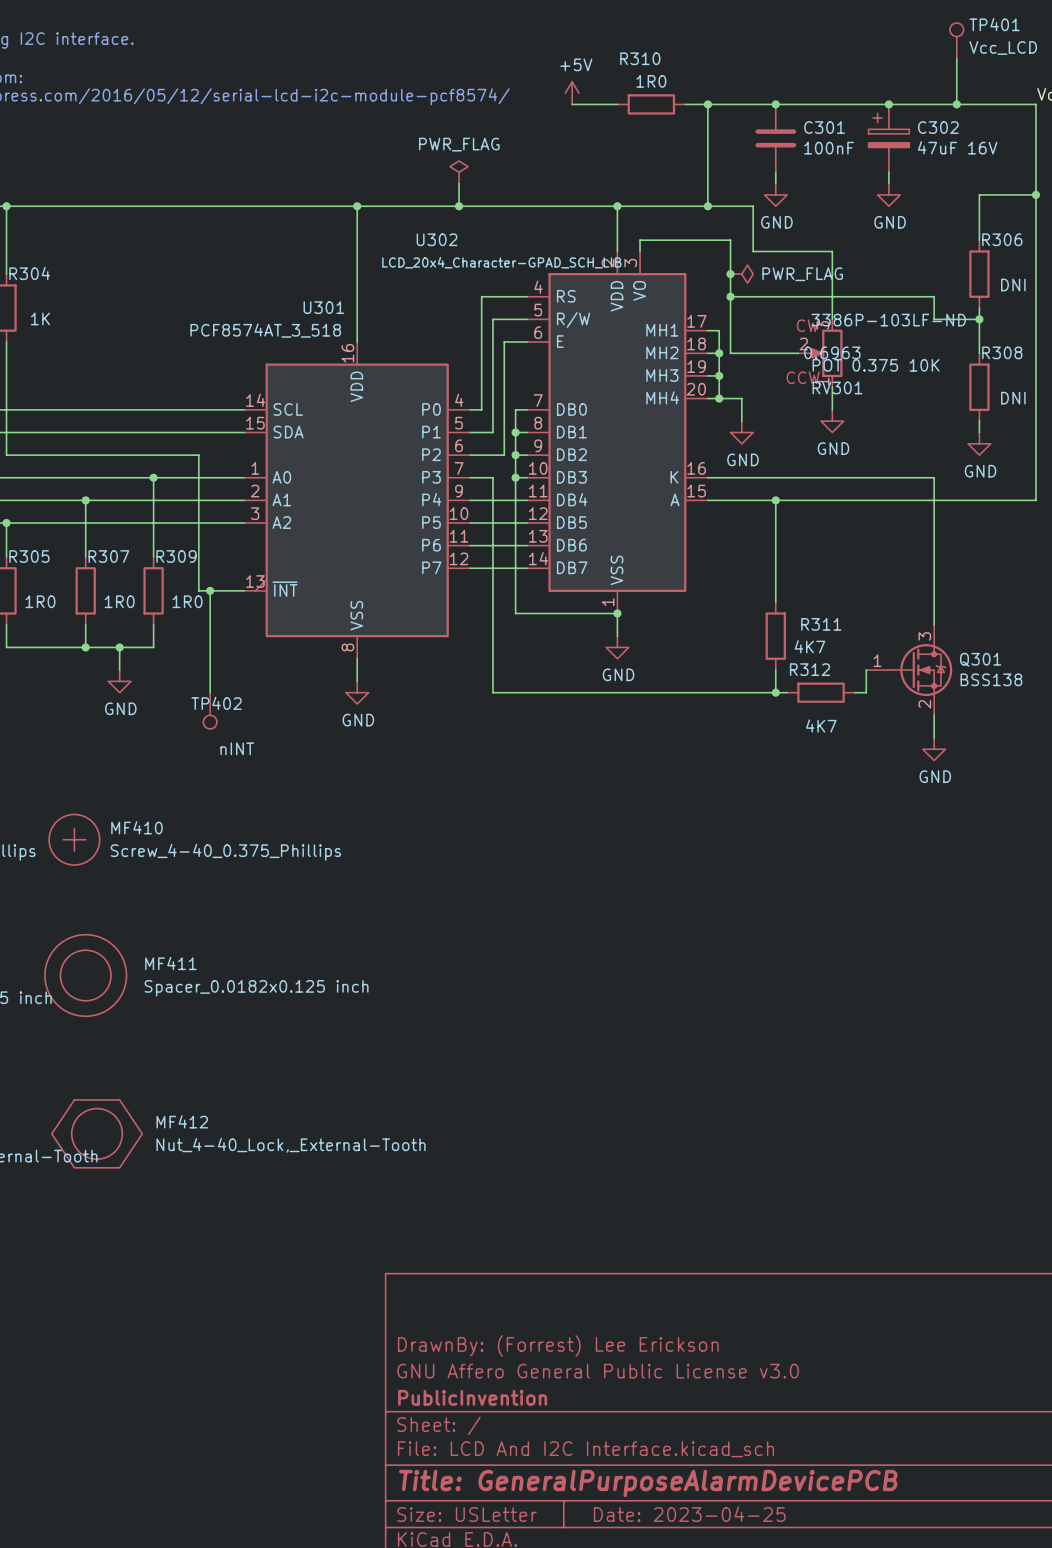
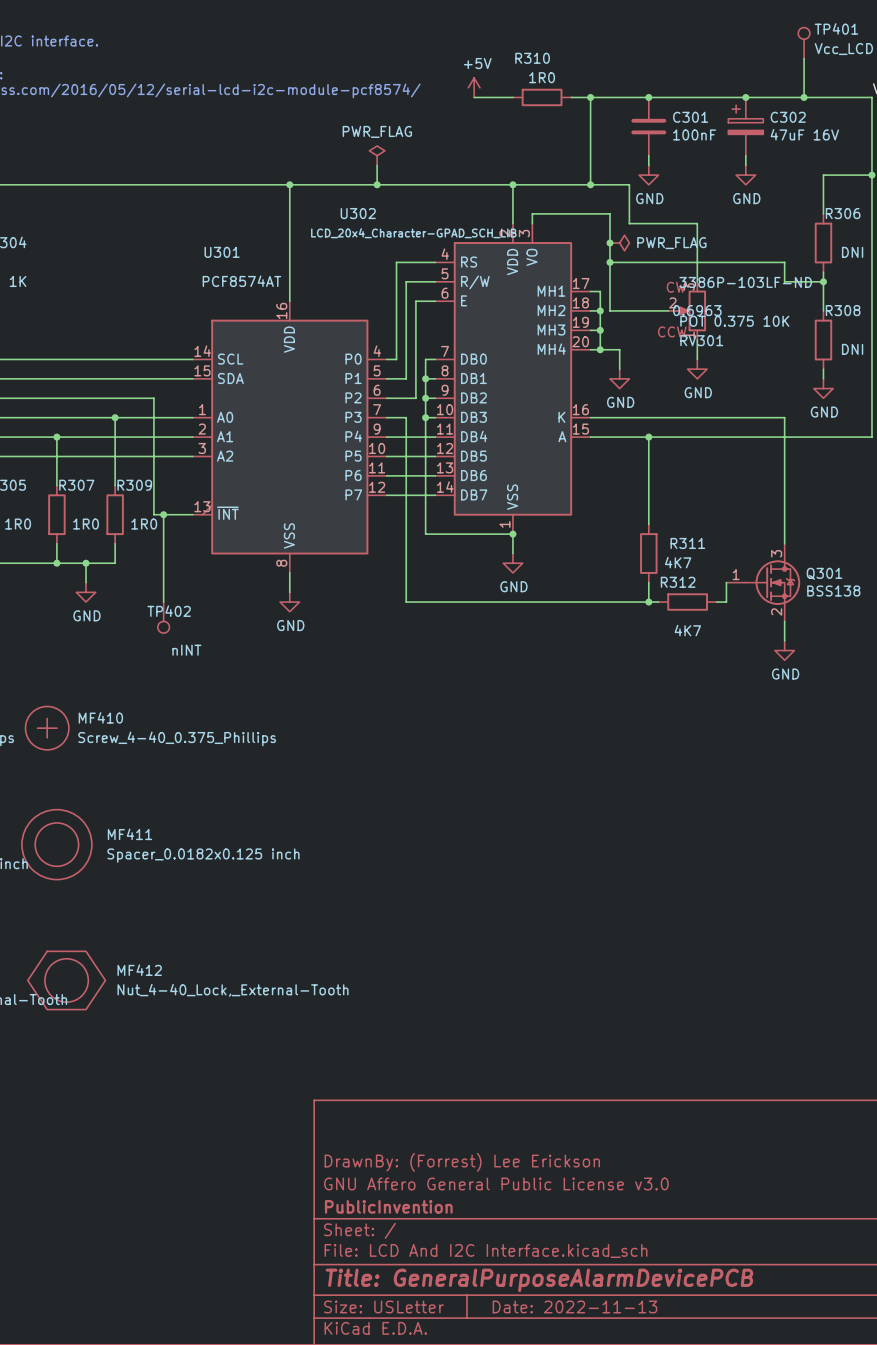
U301 name position: U301 (323, 307) -> U301 (222, 252)
U301 value: PCF8574AT_3_518 (265, 330) -> PCF8574AT (241, 281)
title block: Date: 2023-04-25 (689, 1514) -> Date: 2022-11-13 (574, 1306)

